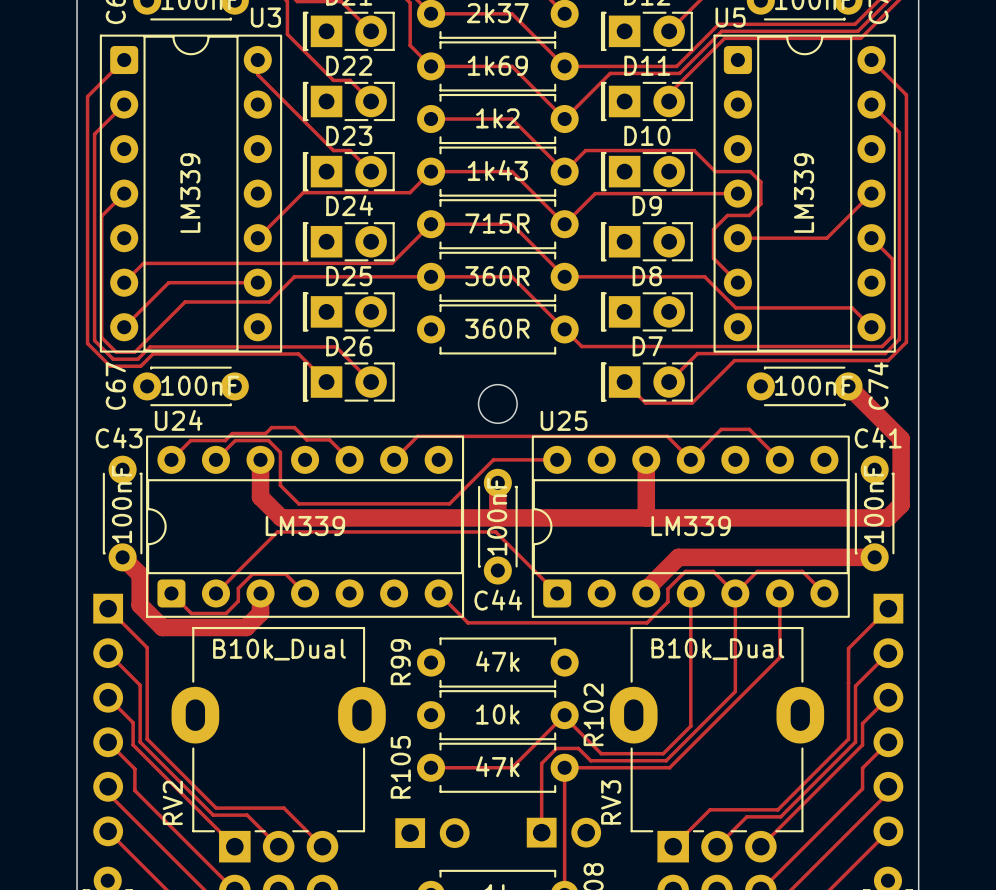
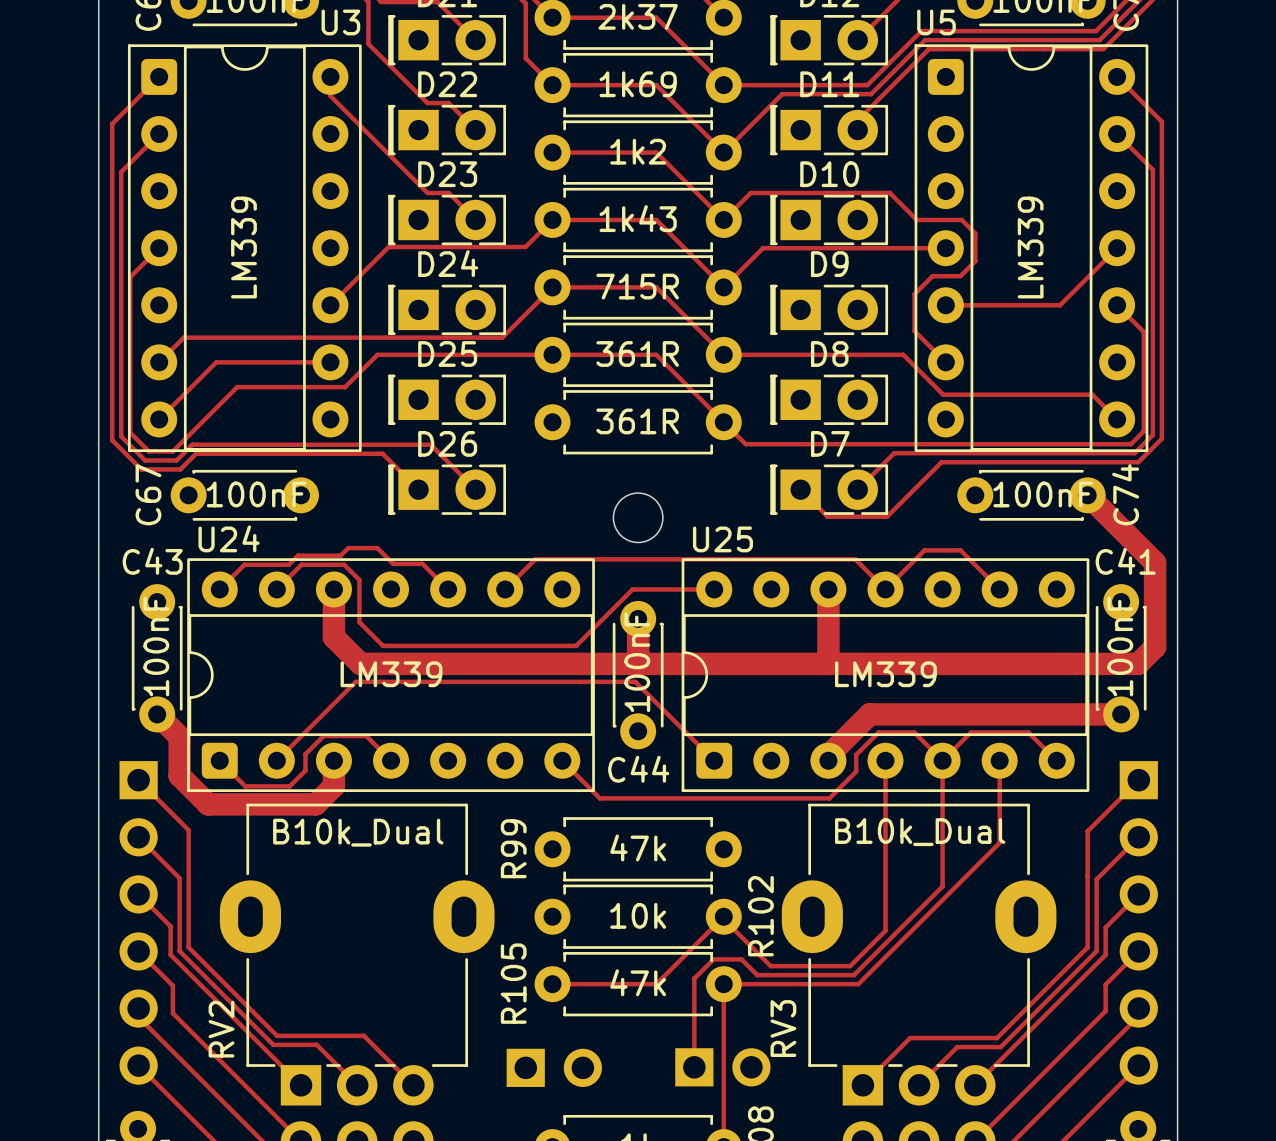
part value: 360R (497, 276) -> 361R (637, 353)
part value: 360R (497, 328) -> 361R (637, 421)

